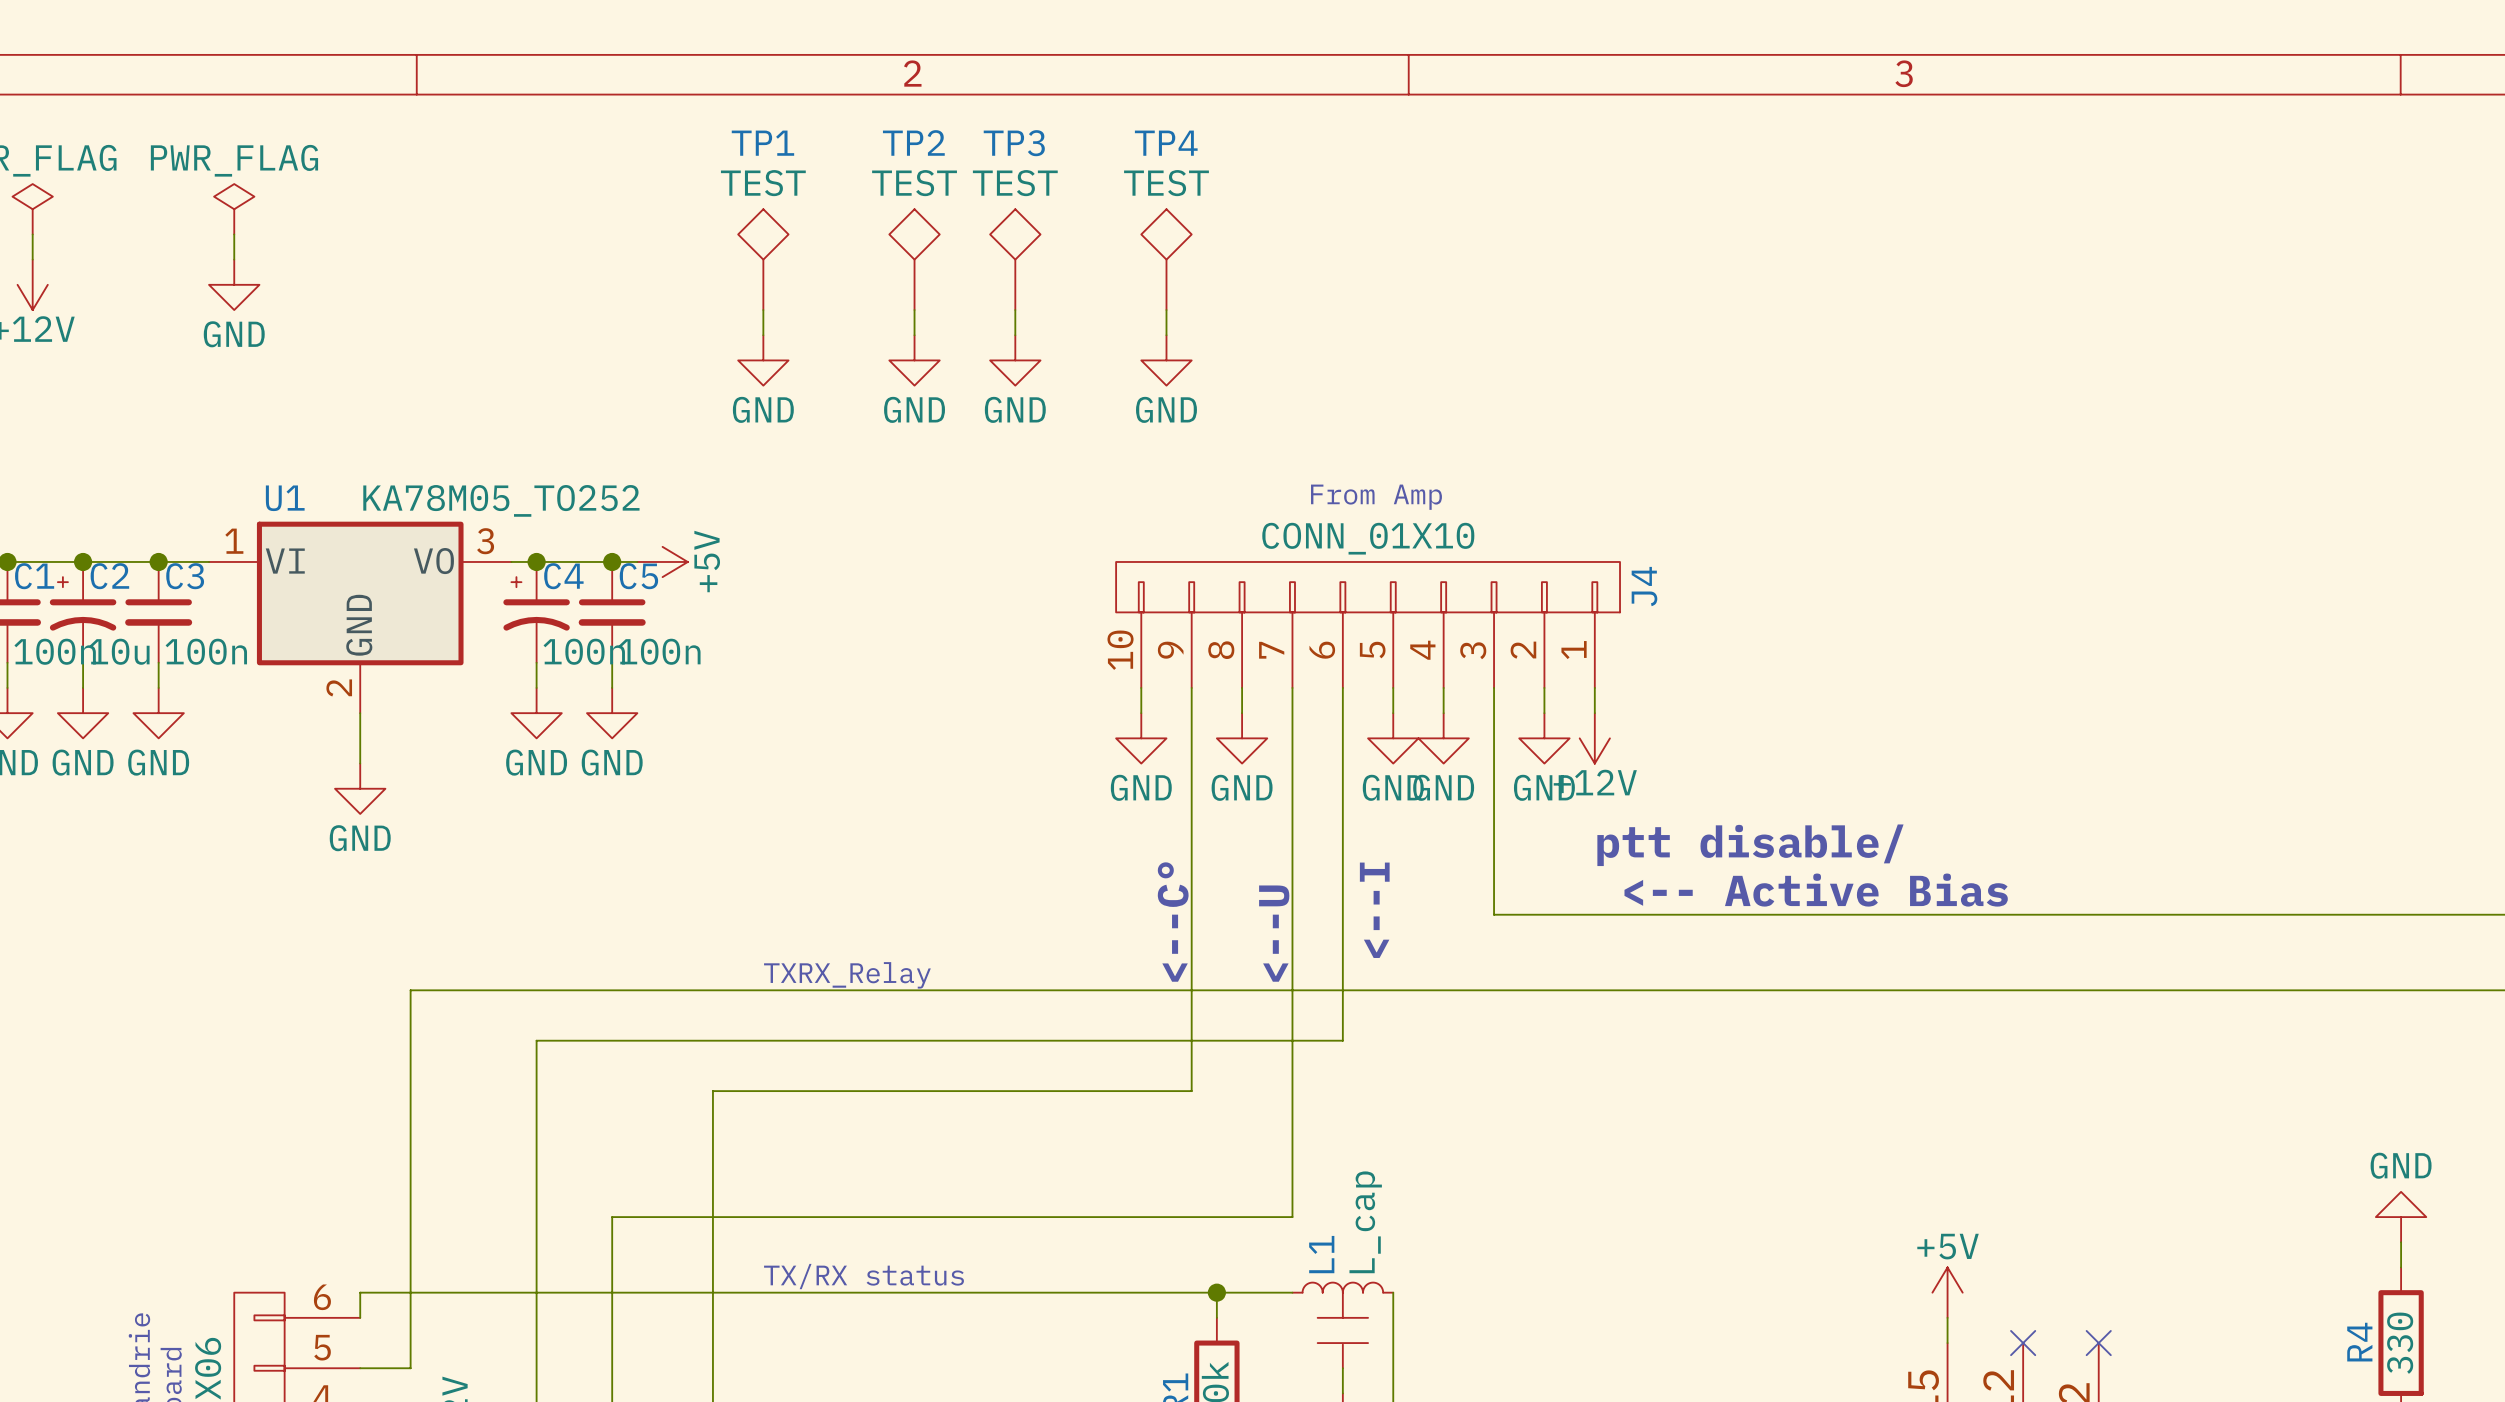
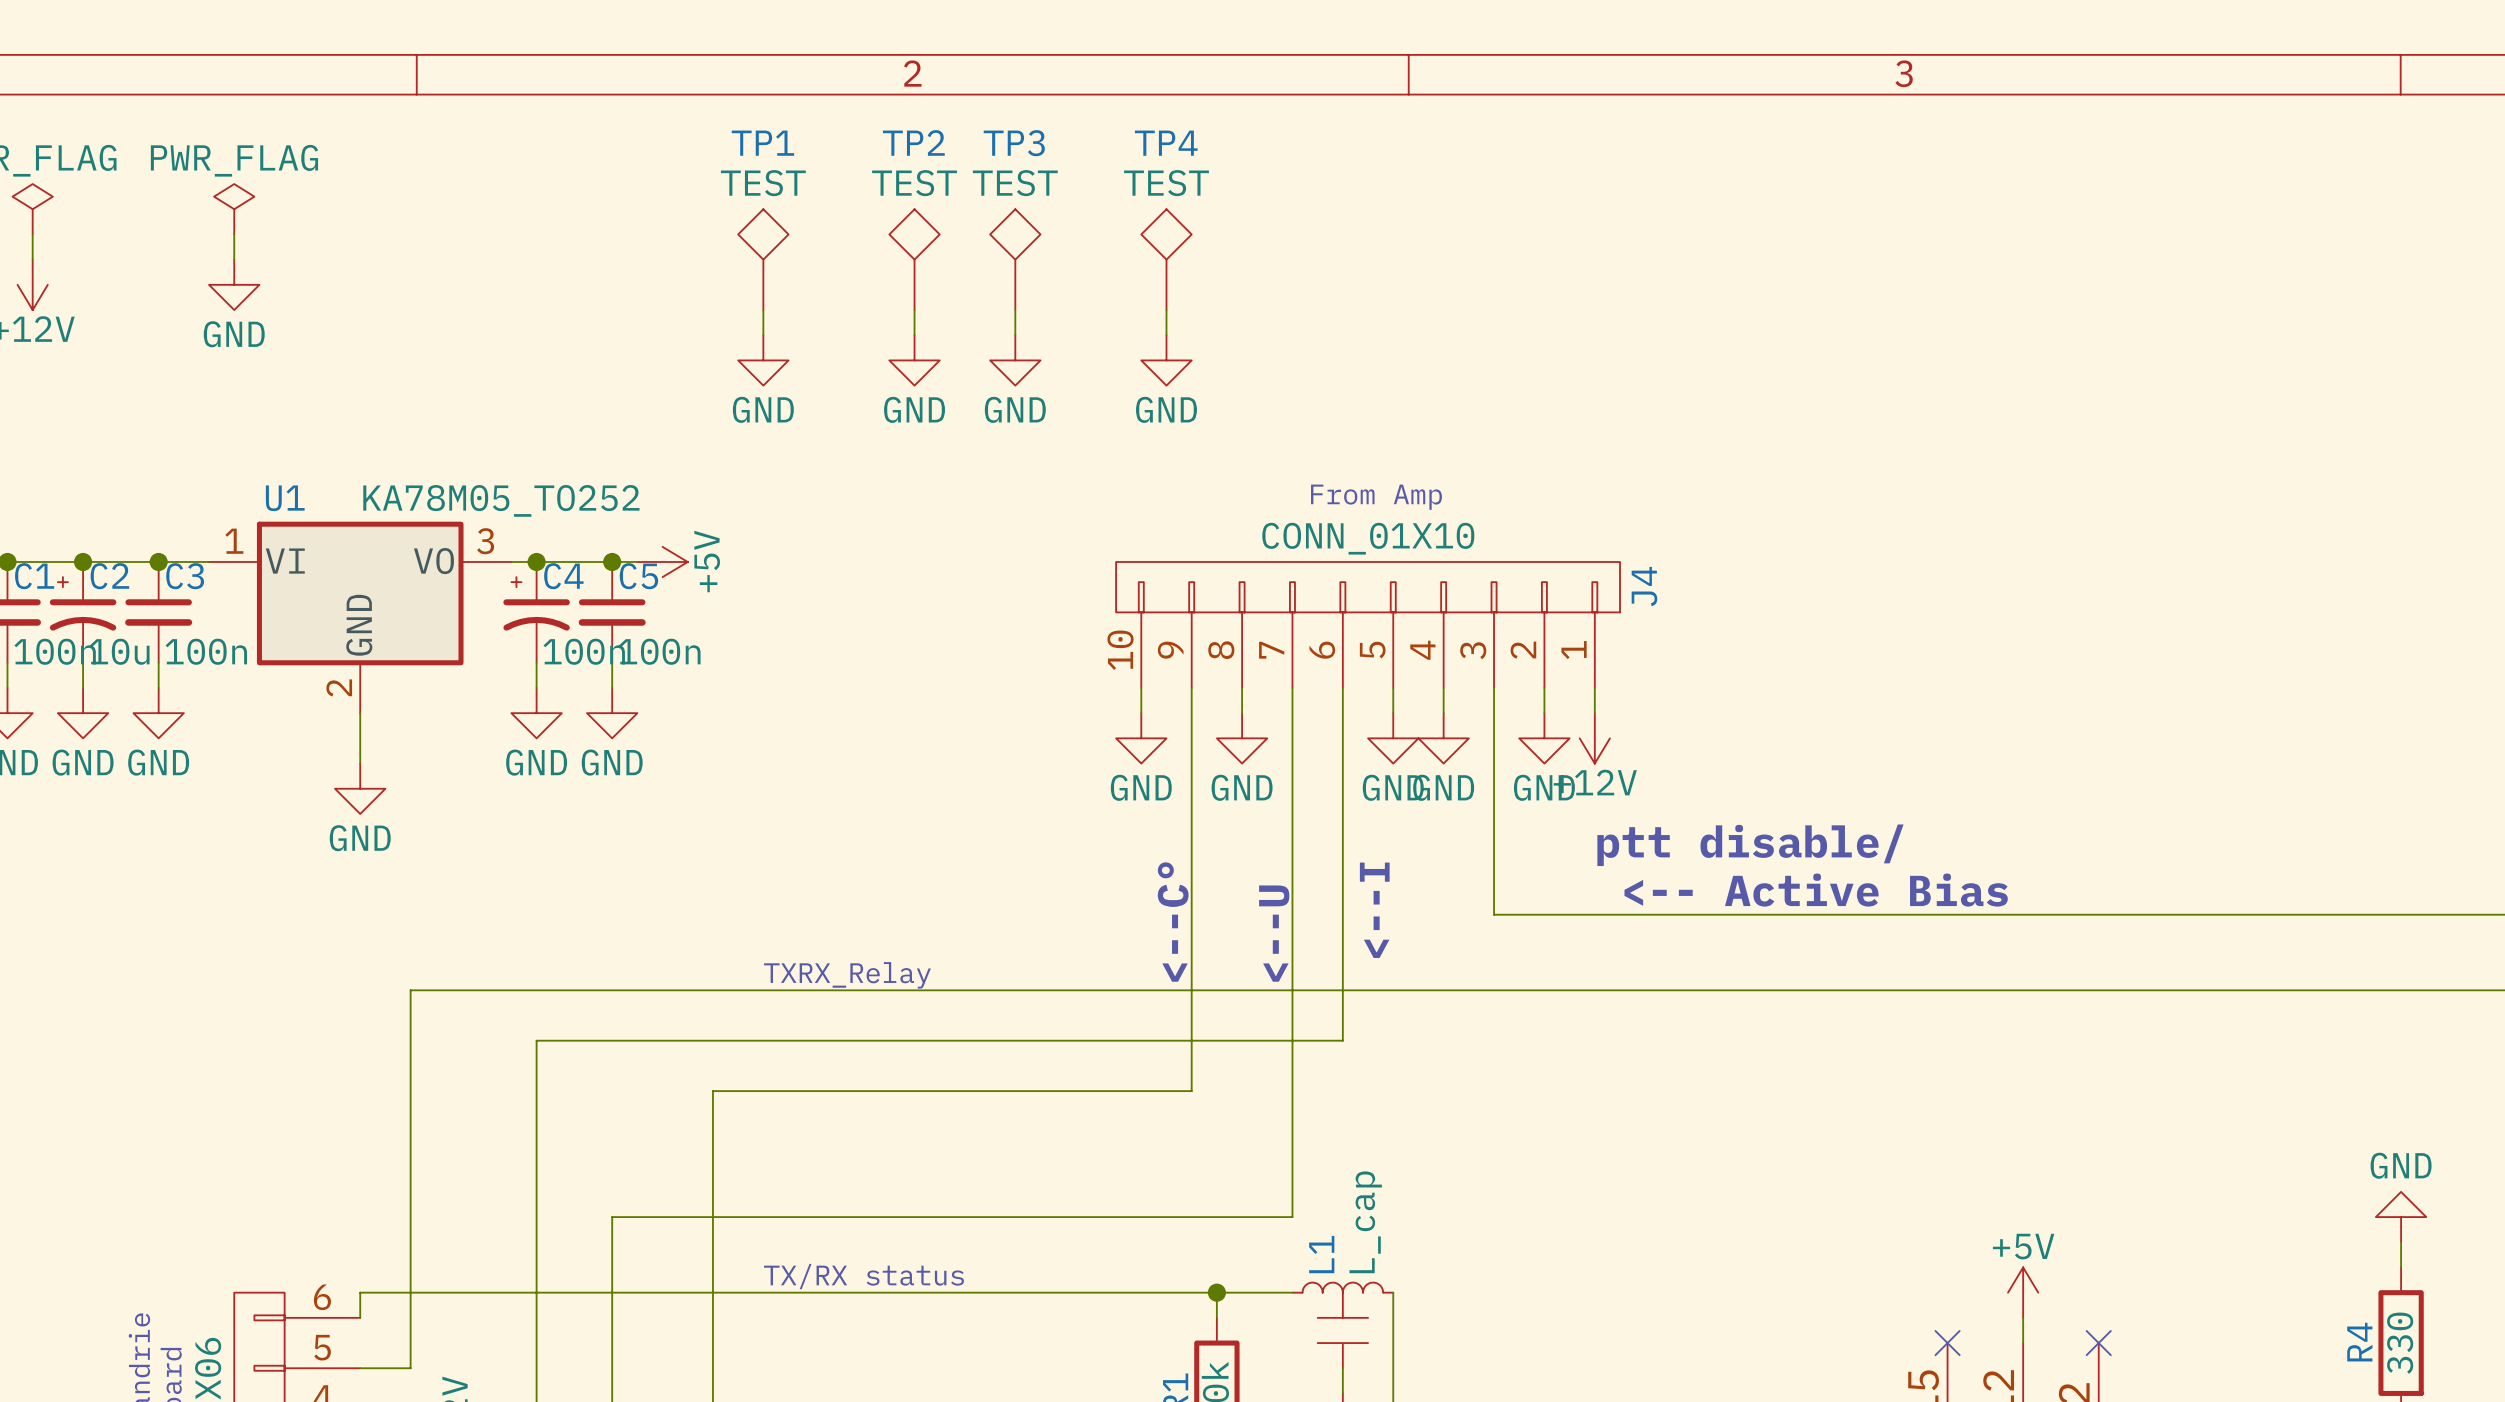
power symbol position: +5V (1947, 1292) -> +5V (2023, 1292)
wire: (1947, 1317) (1947, 1343) -> (2023, 1317) (2023, 1343)
no-connect mark position: (2023, 1343) -> (1947, 1343)

